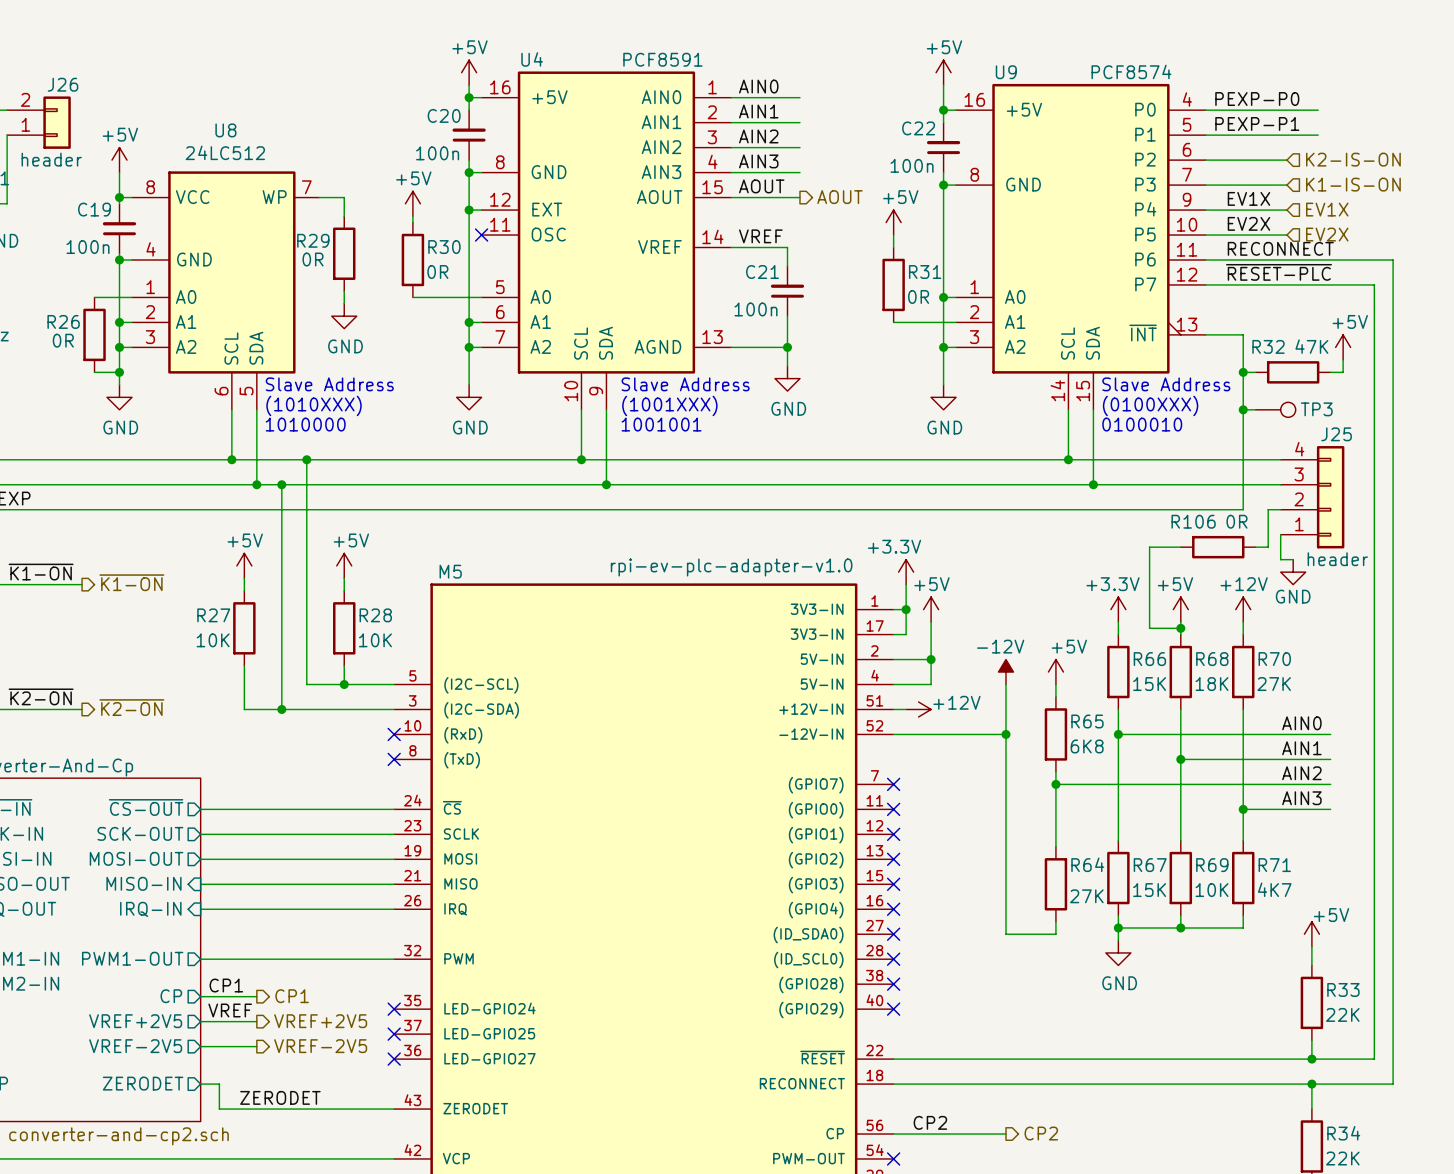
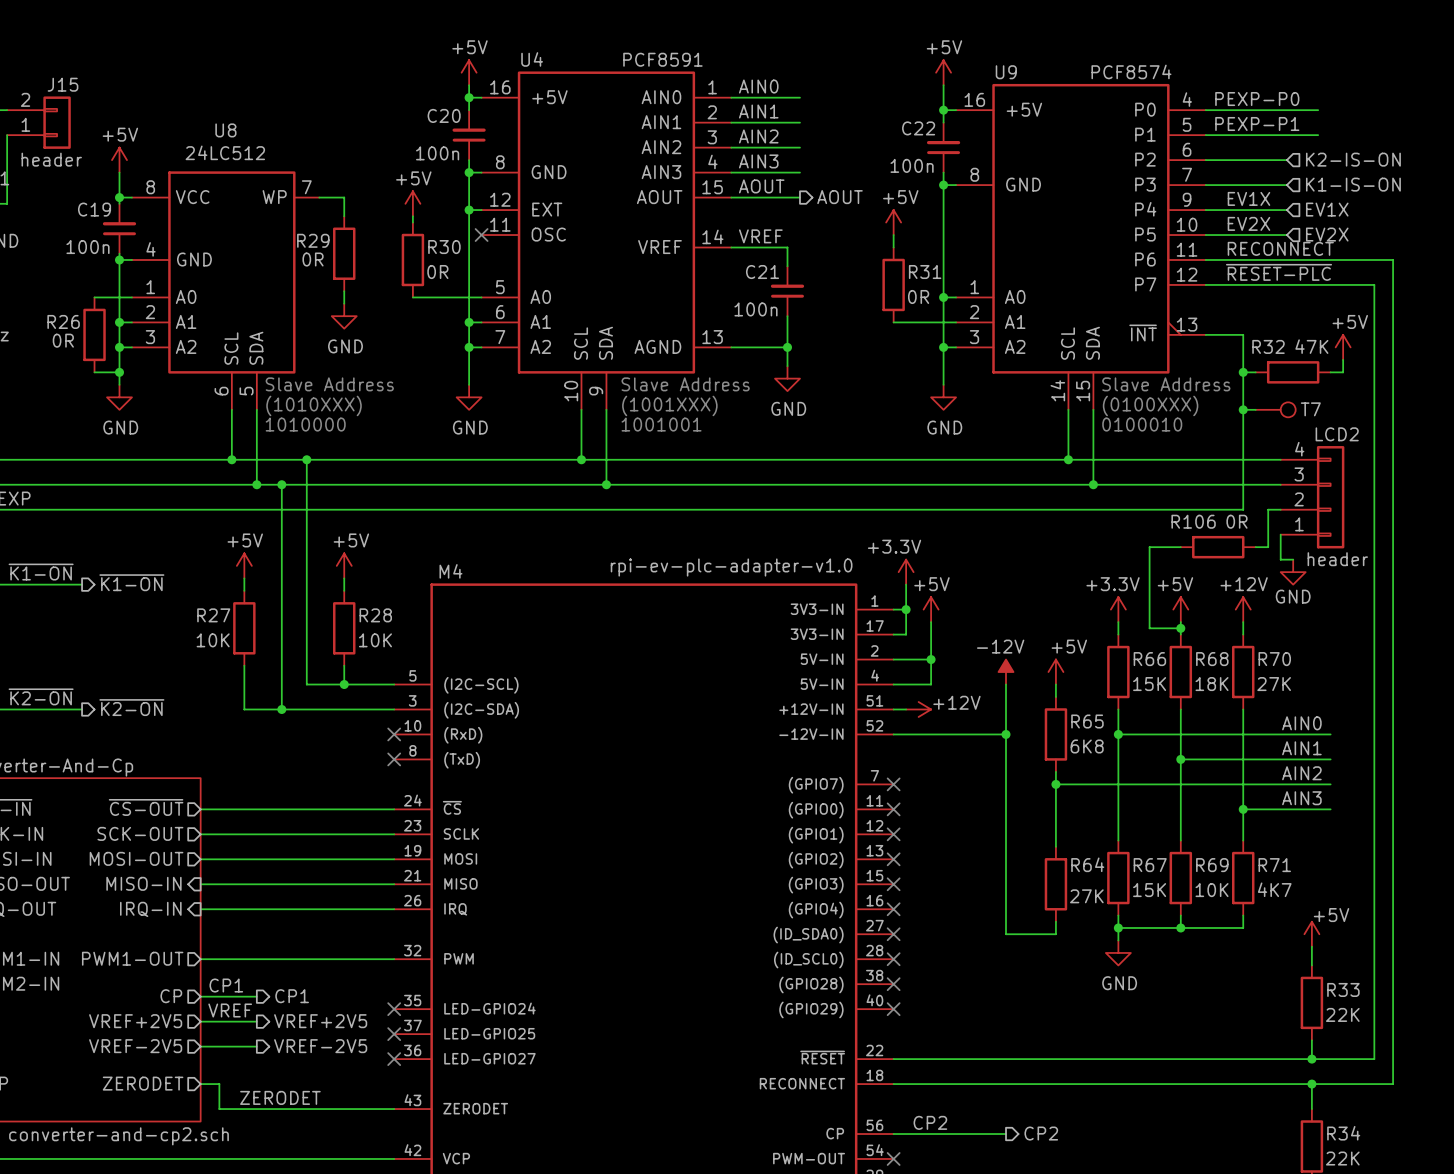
J26 name: J26 (63, 84) -> J15 (63, 84)
TP3 name: TP3 (1316, 409) -> T7 (1310, 409)
J25 name: J25 (1336, 434) -> LCD2 (1337, 434)
M5 name: M5 (450, 571) -> M4 (450, 571)

